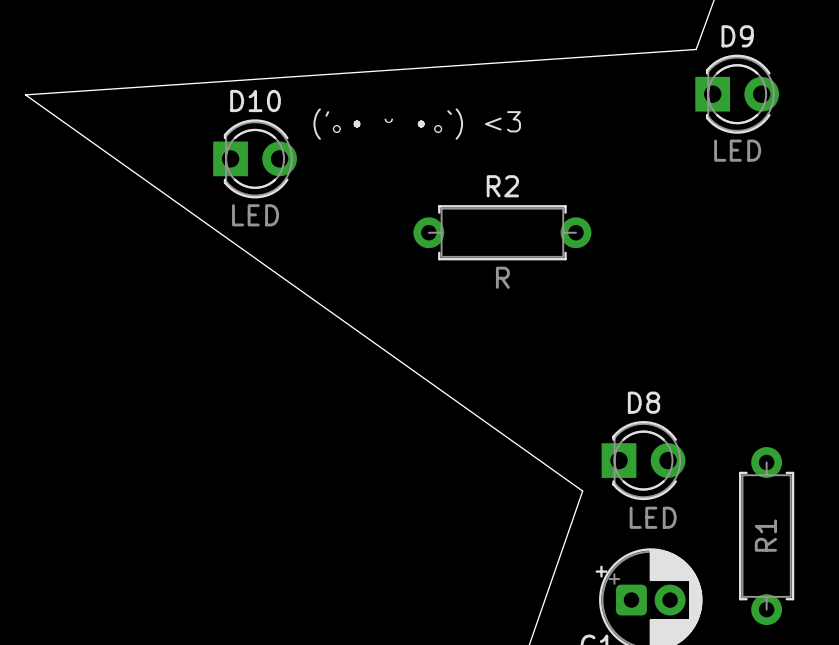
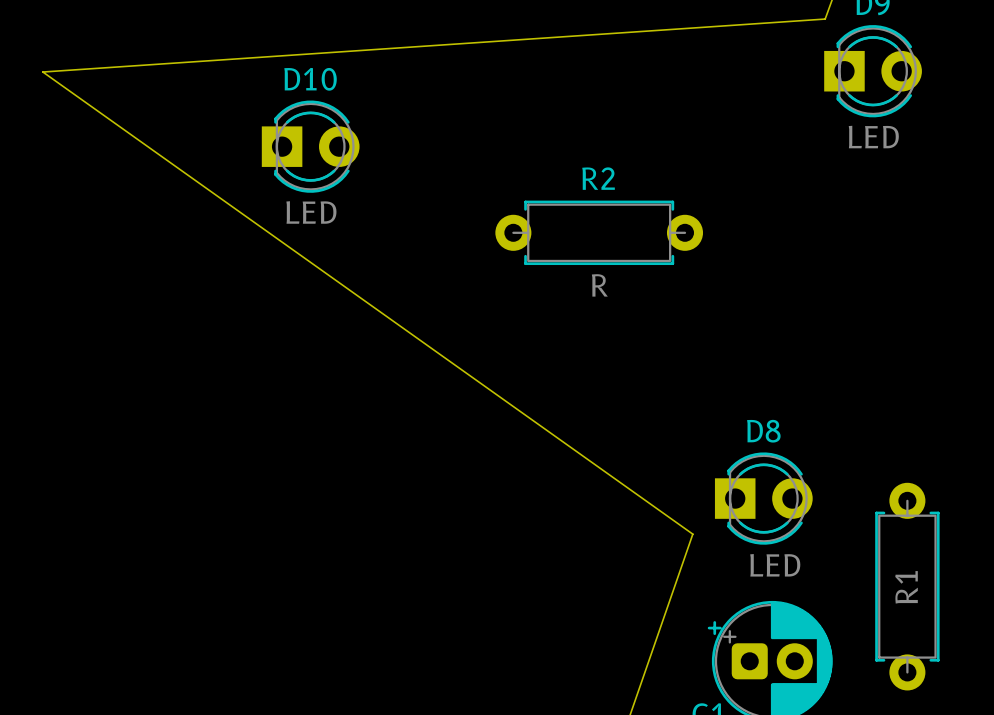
text: ('｡• ᵕ •｡`) <3 (417, 124) -> none

